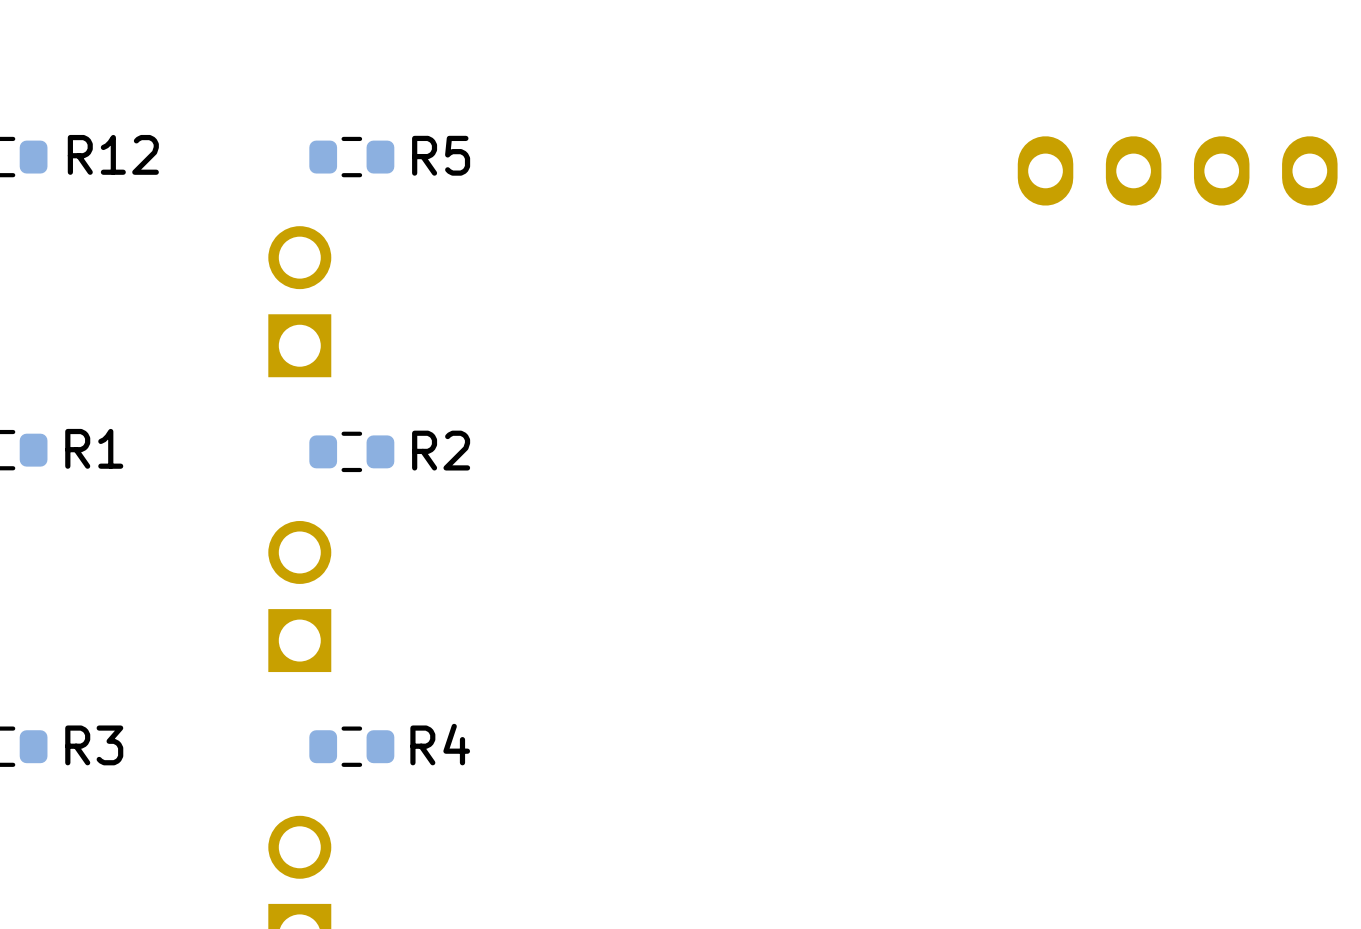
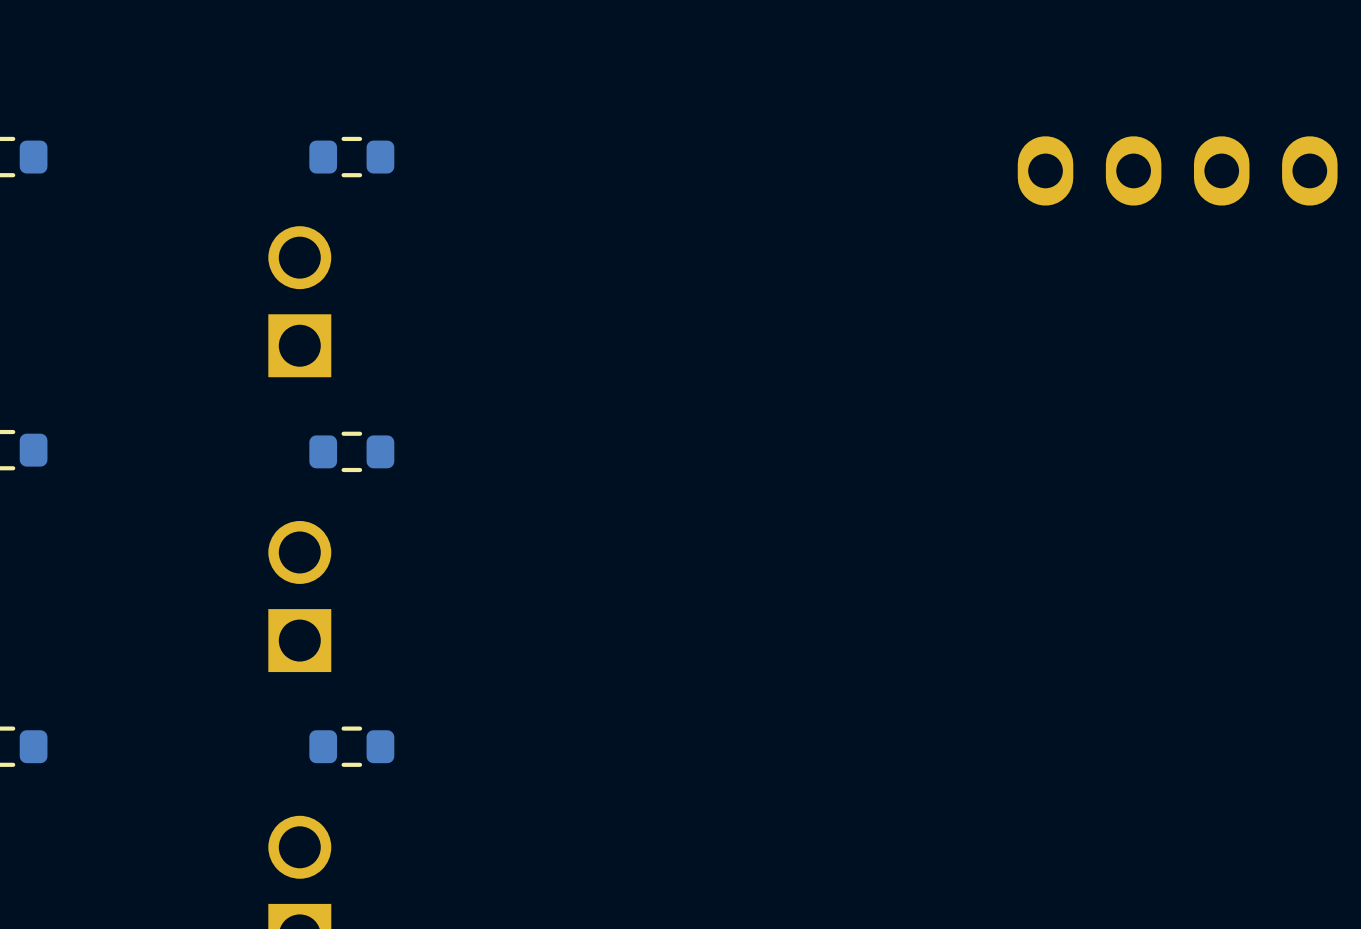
R12 name: R12 (113, 154) -> none
R5 name: R5 (441, 155) -> none
R1 name: R1 (94, 448) -> none
R2 name: R2 (441, 450) -> none
R4 name: R4 (440, 744) -> none
R3 name: R3 (94, 745) -> none

